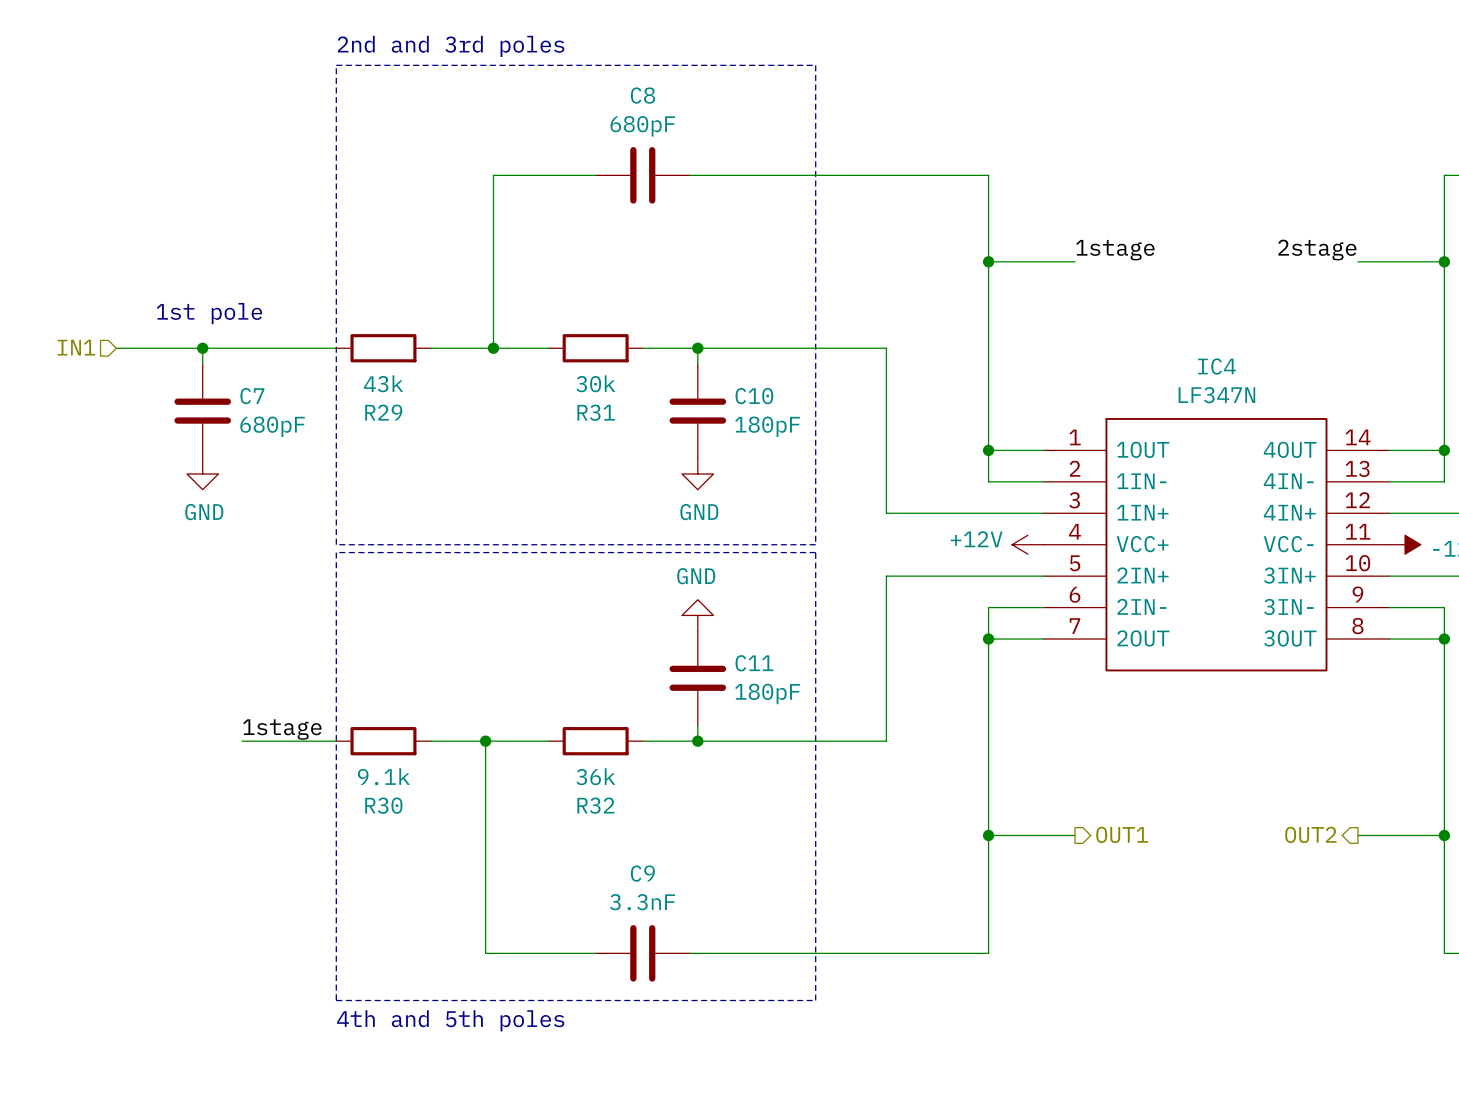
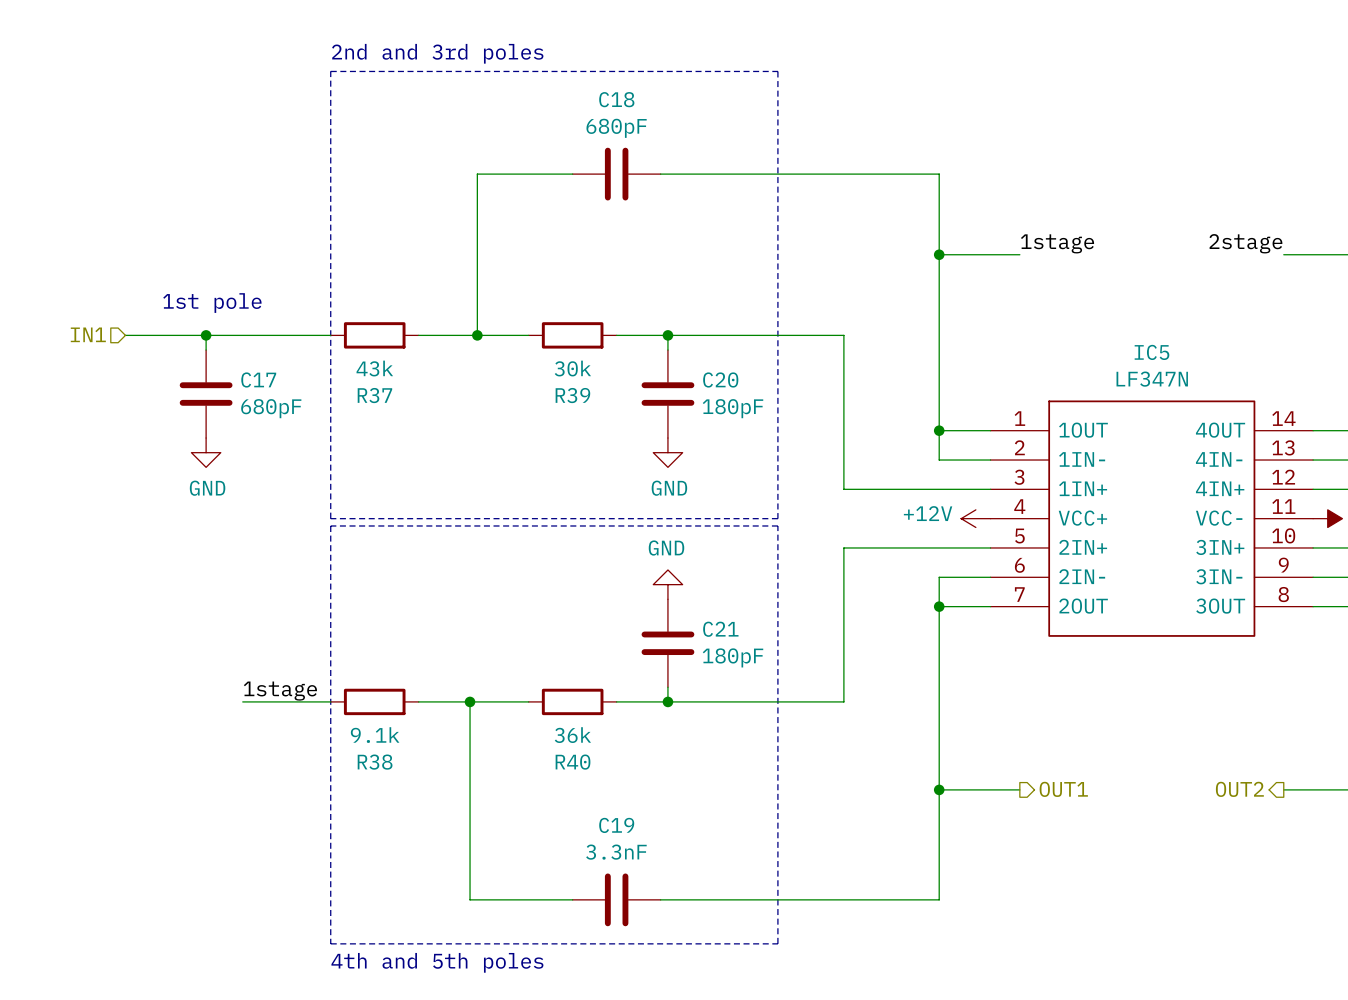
C8 name: C8 (642, 95) -> C18 (616, 99)
IC4 name: IC4 (1216, 366) -> IC5 (1151, 352)
C7 name: C7 (252, 396) -> C17 (258, 379)
C10 name: C10 (754, 396) -> C20 (720, 379)
R29 name: R29 (383, 412) -> R37 (374, 395)
R31 name: R31 (596, 412) -> R39 (572, 395)
C11 name: C11 (754, 663) -> C21 (720, 629)
R30 name: R30 (383, 805) -> R38 (375, 762)
R32 name: R32 (595, 805) -> R40 (573, 762)
C9 name: C9 (642, 873) -> C19 (616, 825)

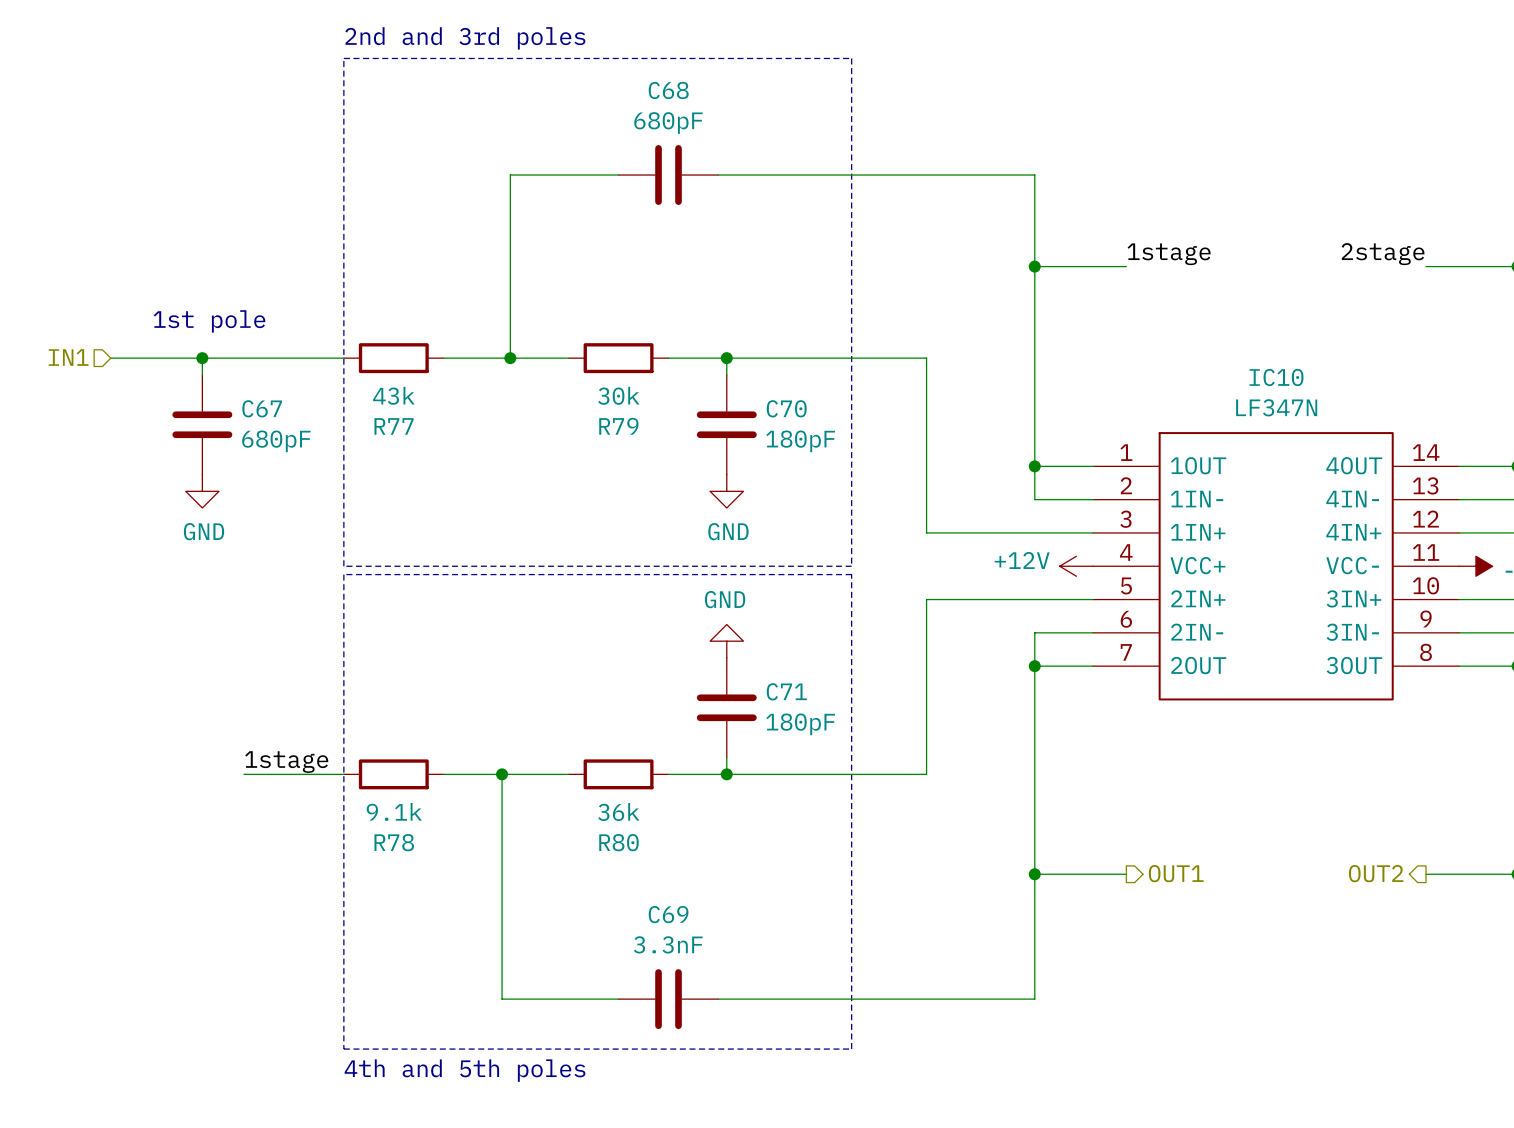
C18 name: C18 (616, 99) -> C68 (668, 90)
IC5 name: IC5 (1151, 352) -> IC10 (1276, 377)
C17 name: C17 (258, 379) -> C67 (262, 408)
C20 name: C20 (720, 379) -> C70 (786, 408)
R37 name: R37 (374, 395) -> R77 (394, 426)
R39 name: R39 (572, 395) -> R79 (618, 426)
C21 name: C21 (720, 629) -> C71 (786, 691)
R38 name: R38 (375, 762) -> R78 (394, 842)
R40 name: R40 (573, 762) -> R80 (618, 842)
C19 name: C19 (616, 825) -> C69 (668, 914)

